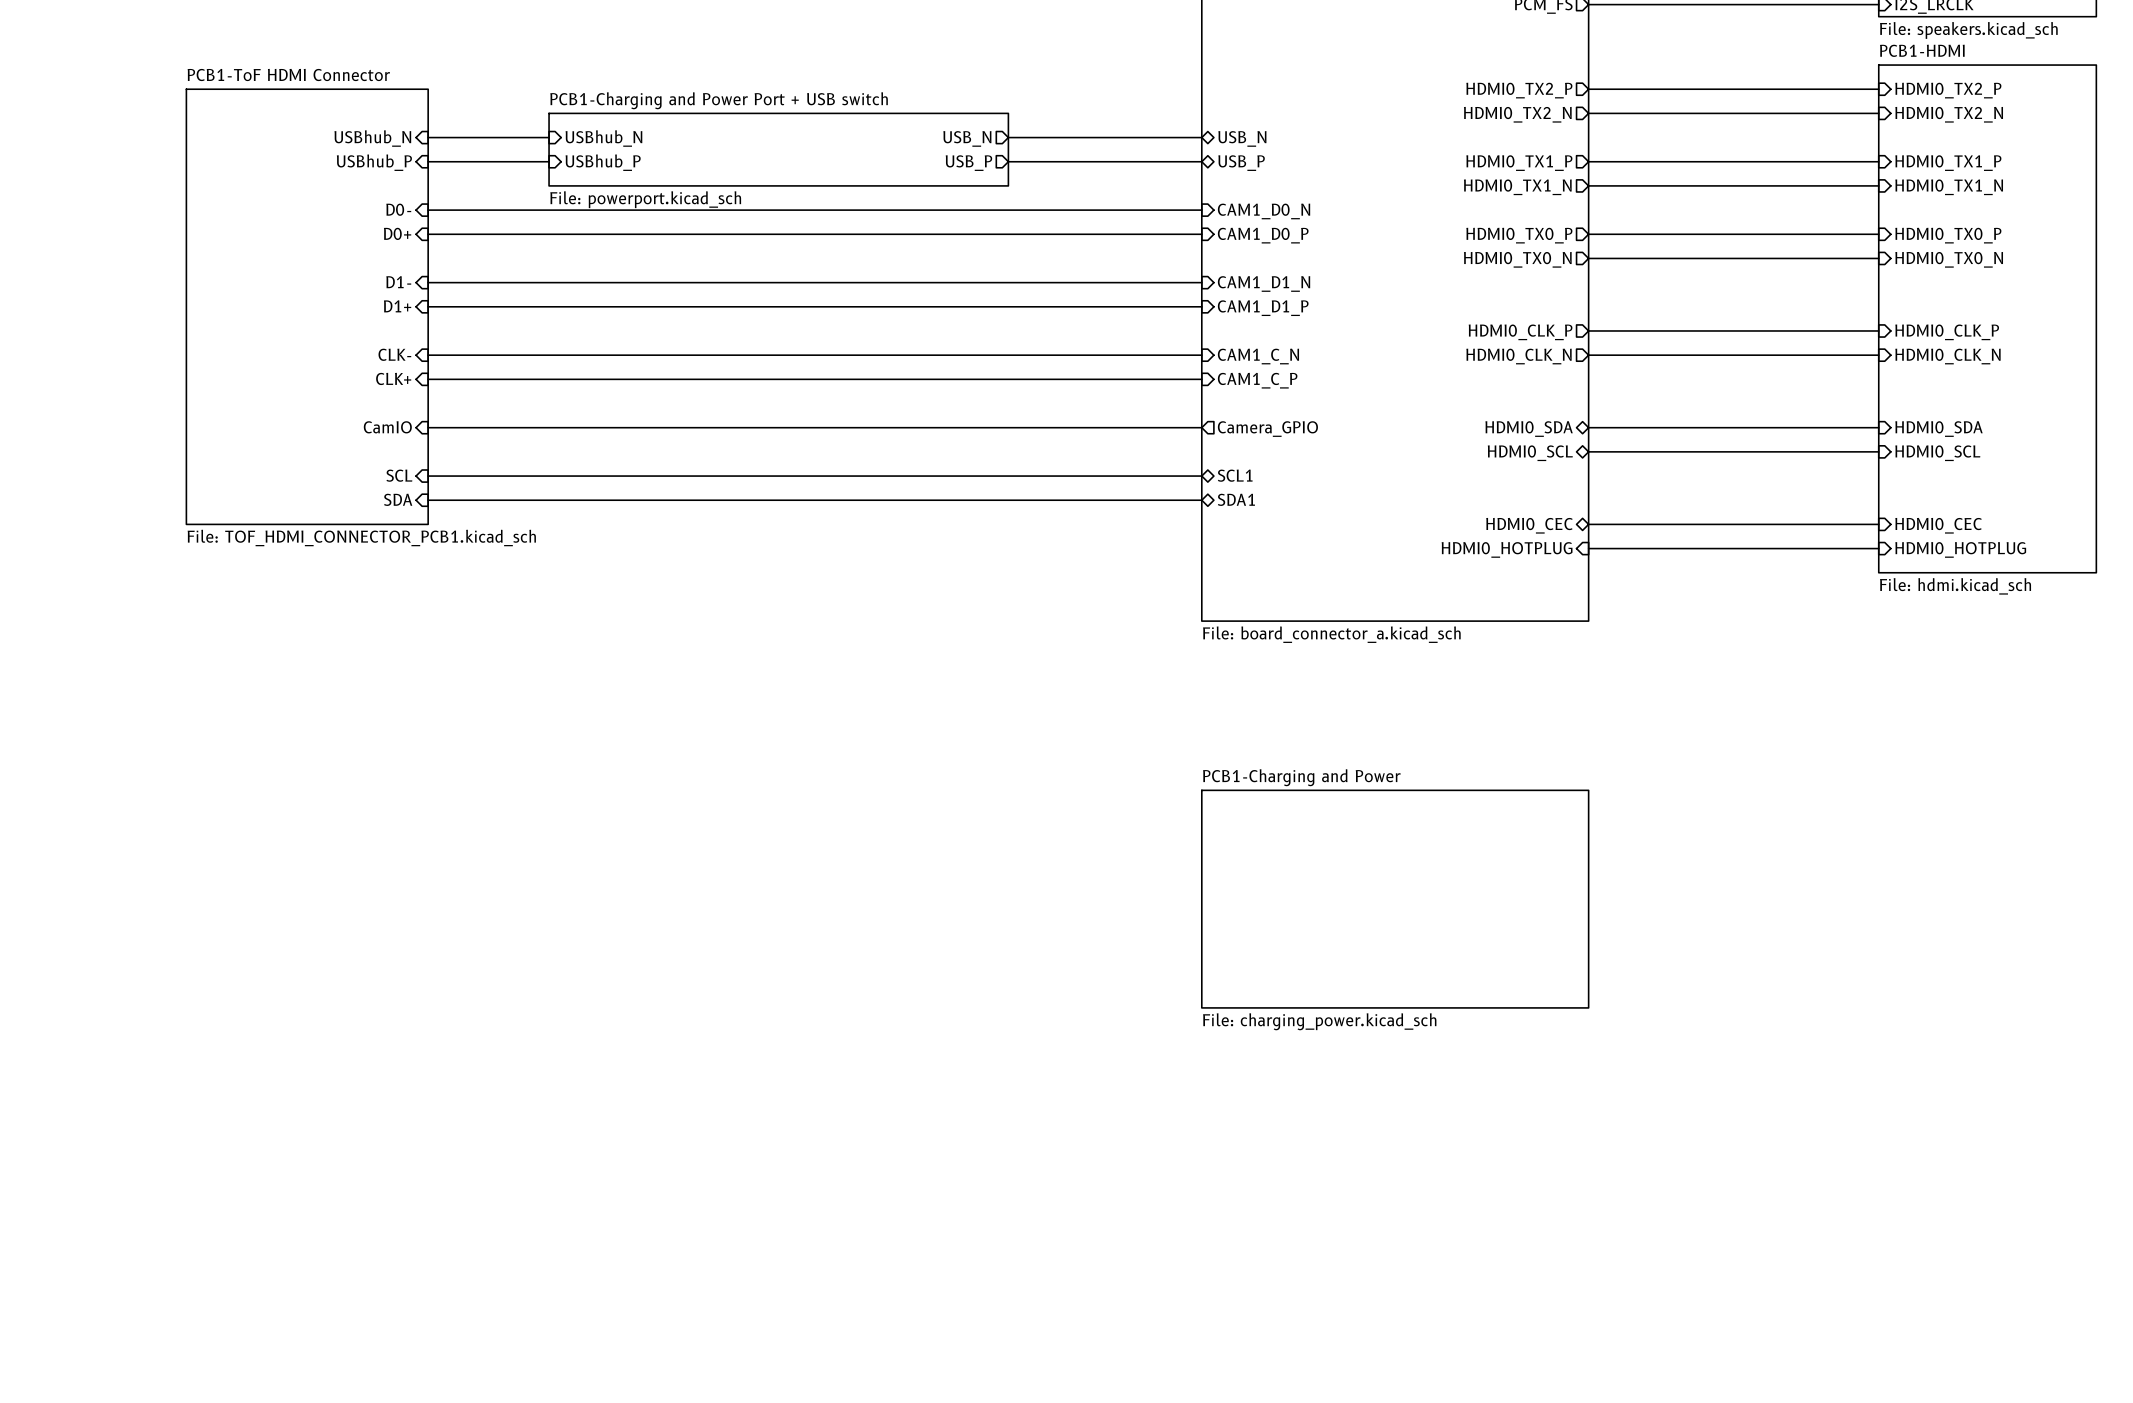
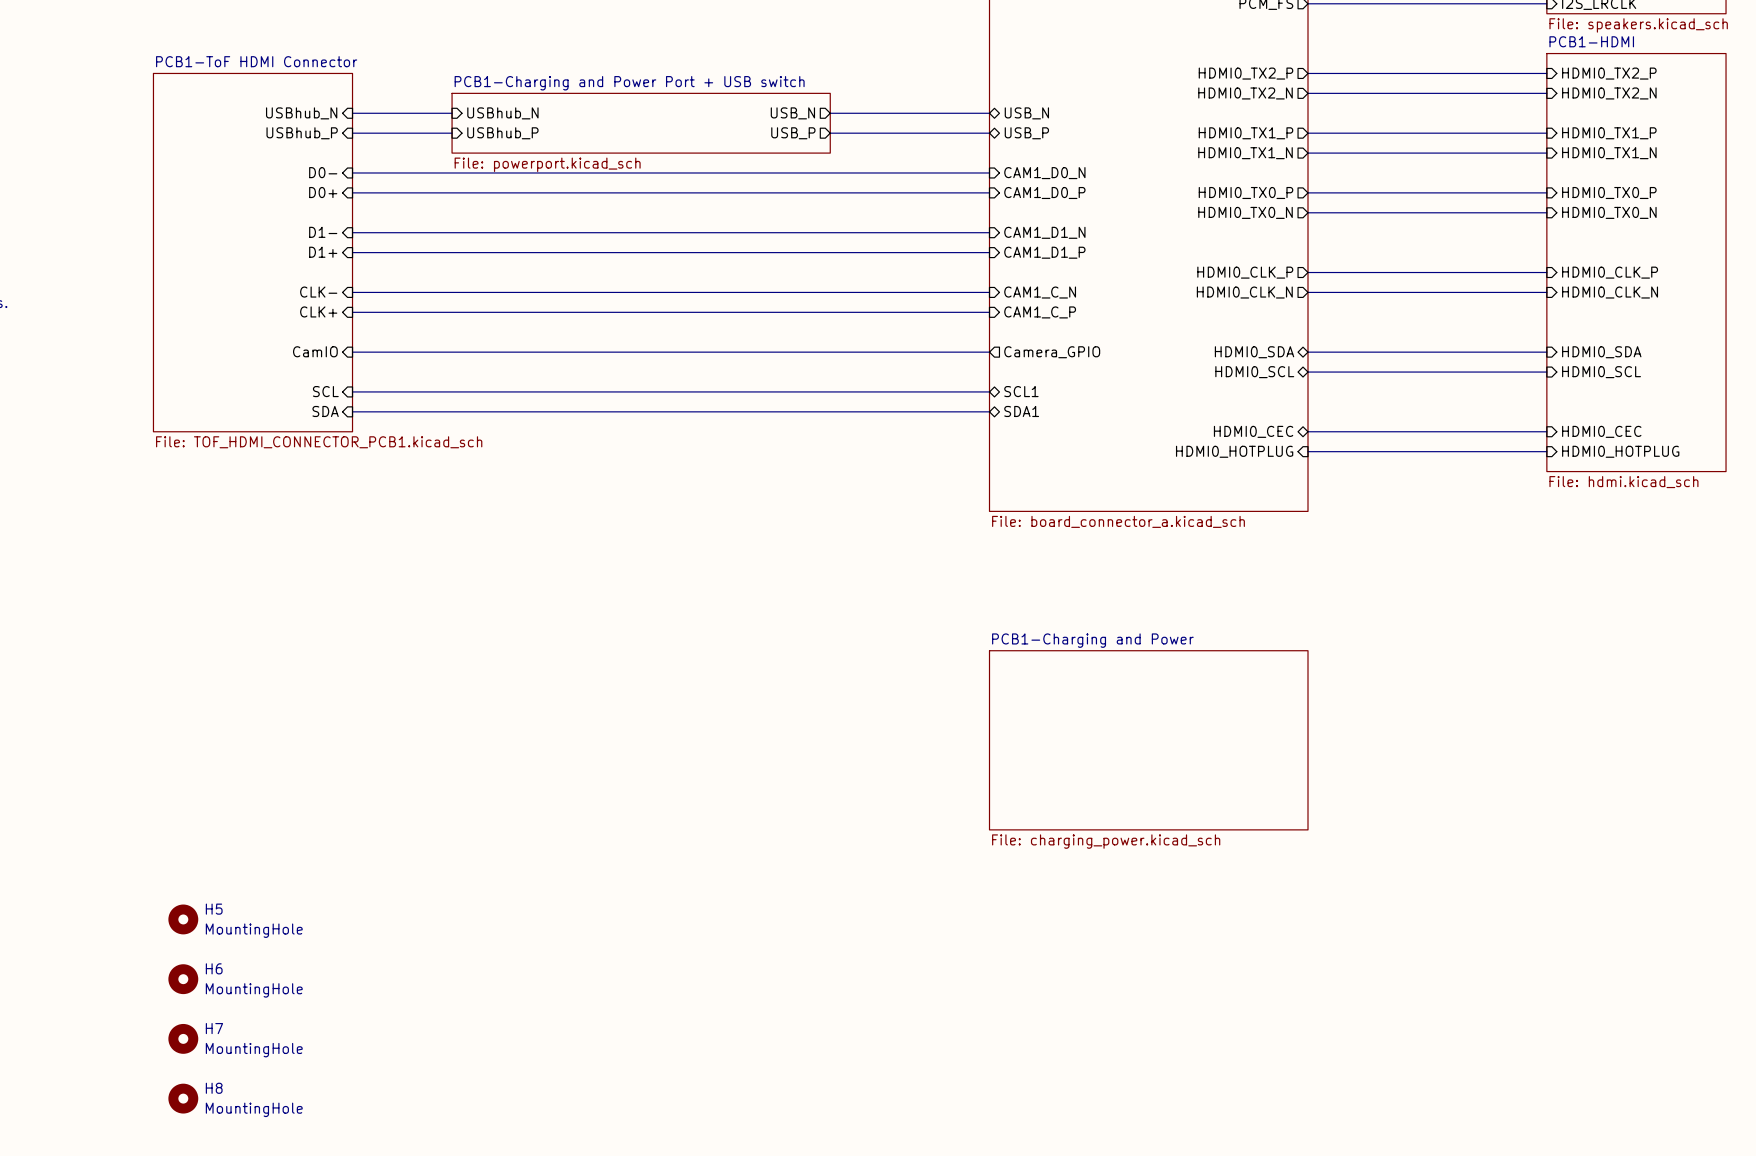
H5: none -> MountingHole (183, 919)
H6: none -> MountingHole (183, 979)
H7: none -> MountingHole (183, 1038)
H8: none -> MountingHole (183, 1098)

